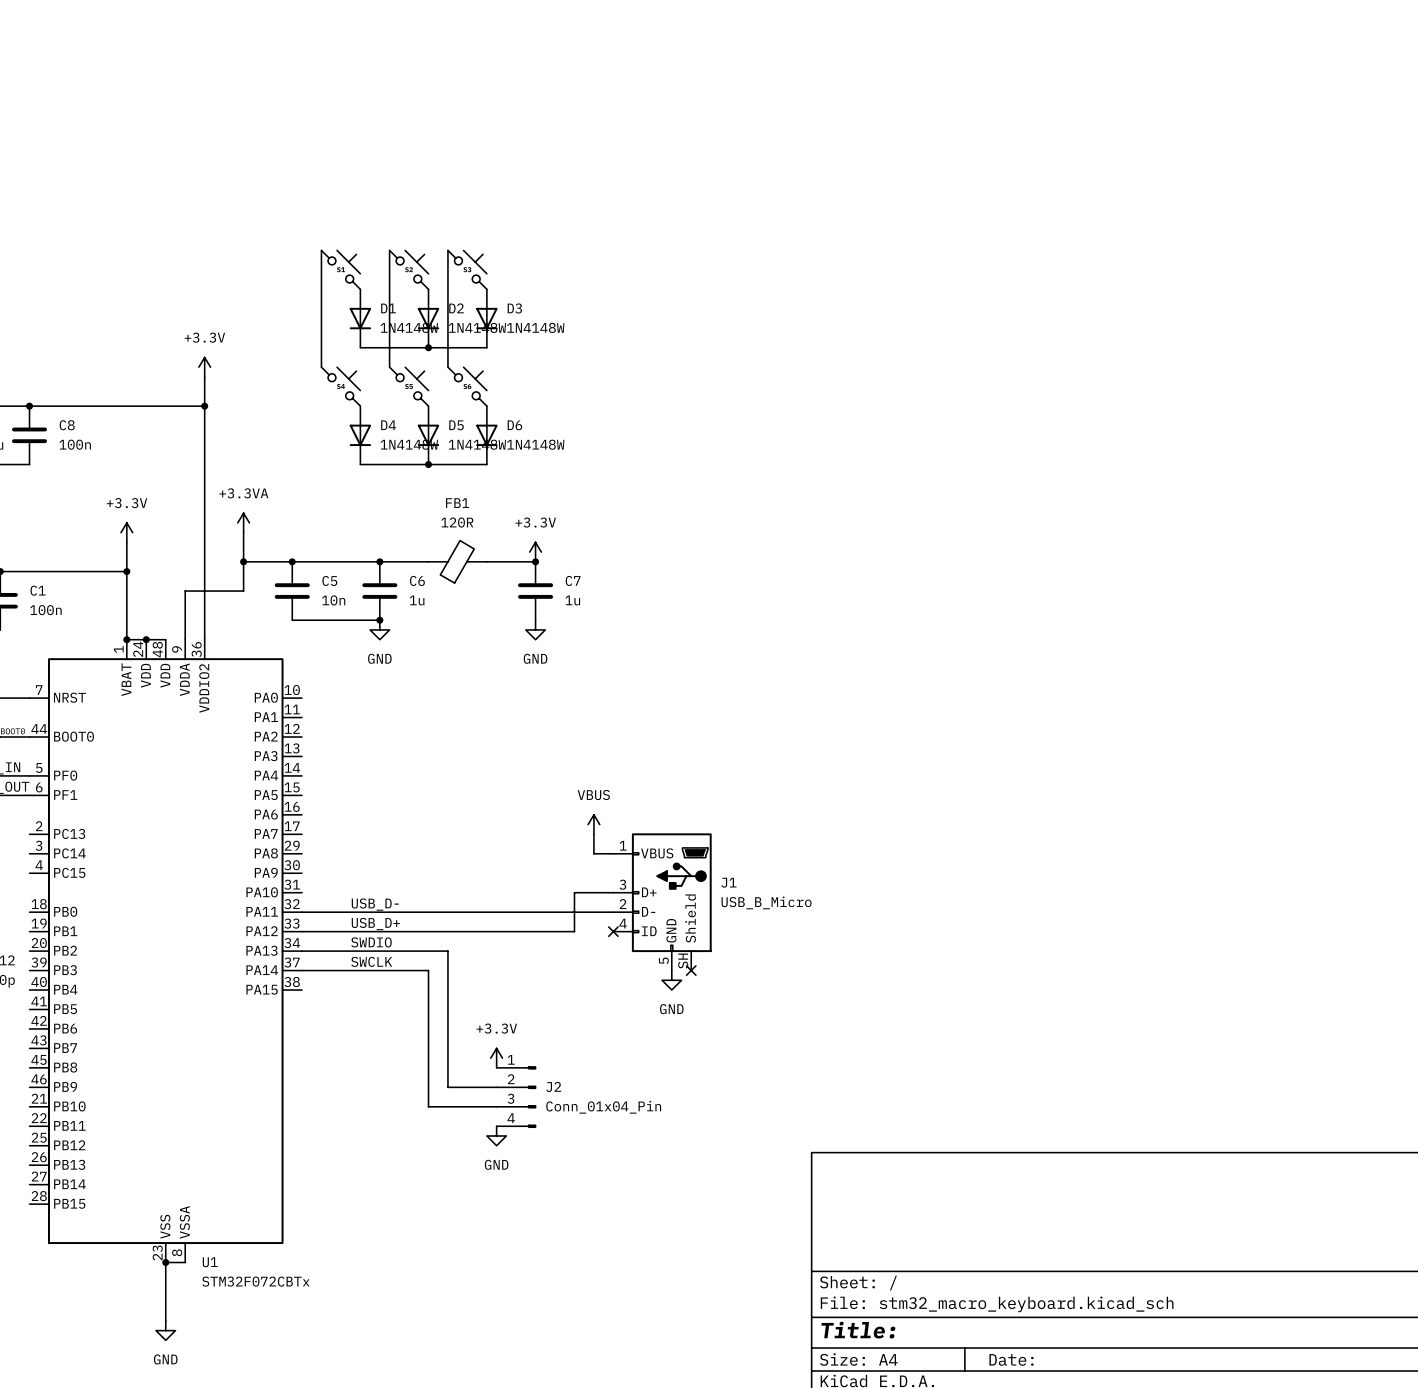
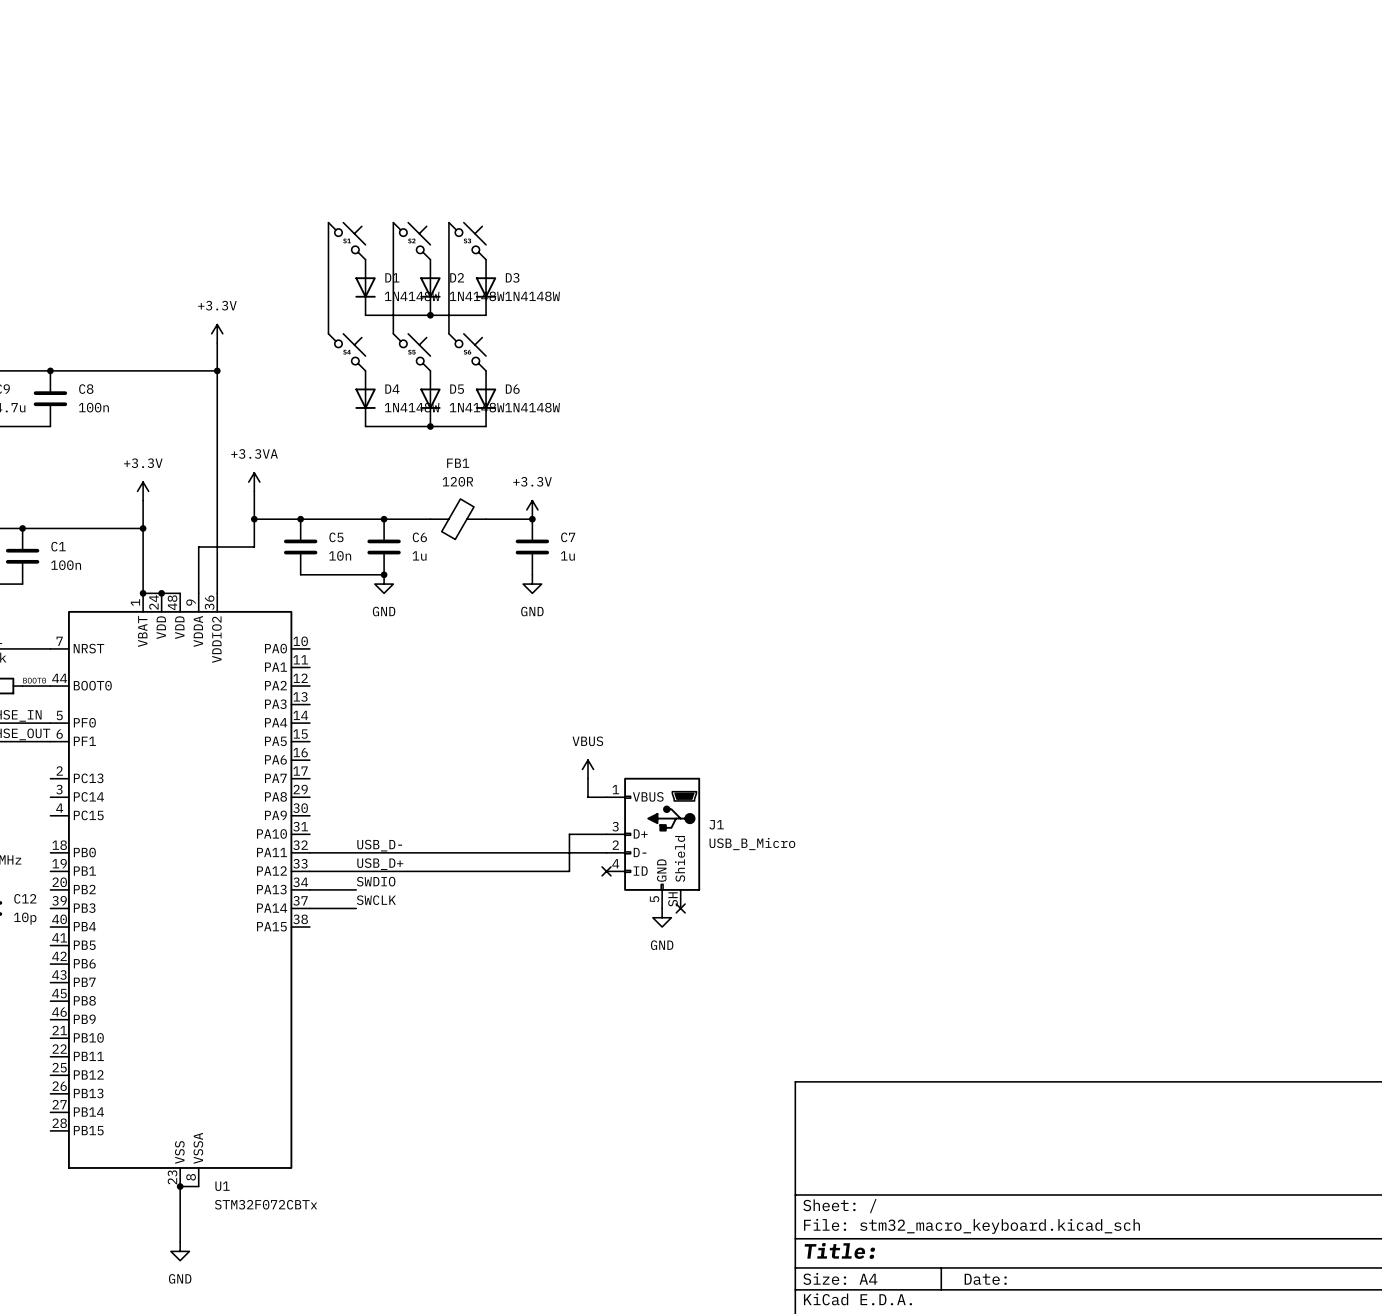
wire: (350, 951) (447, 951) (447, 1087) (496, 1087) -> none
wire: (350, 970) (428, 970) (428, 1106) (496, 1106) -> none
power symbol: +3.3V (496, 1058) -> none
J2: Conn_01x04_Pin (516, 1097) -> none
power symbol: GND (496, 1135) -> none

